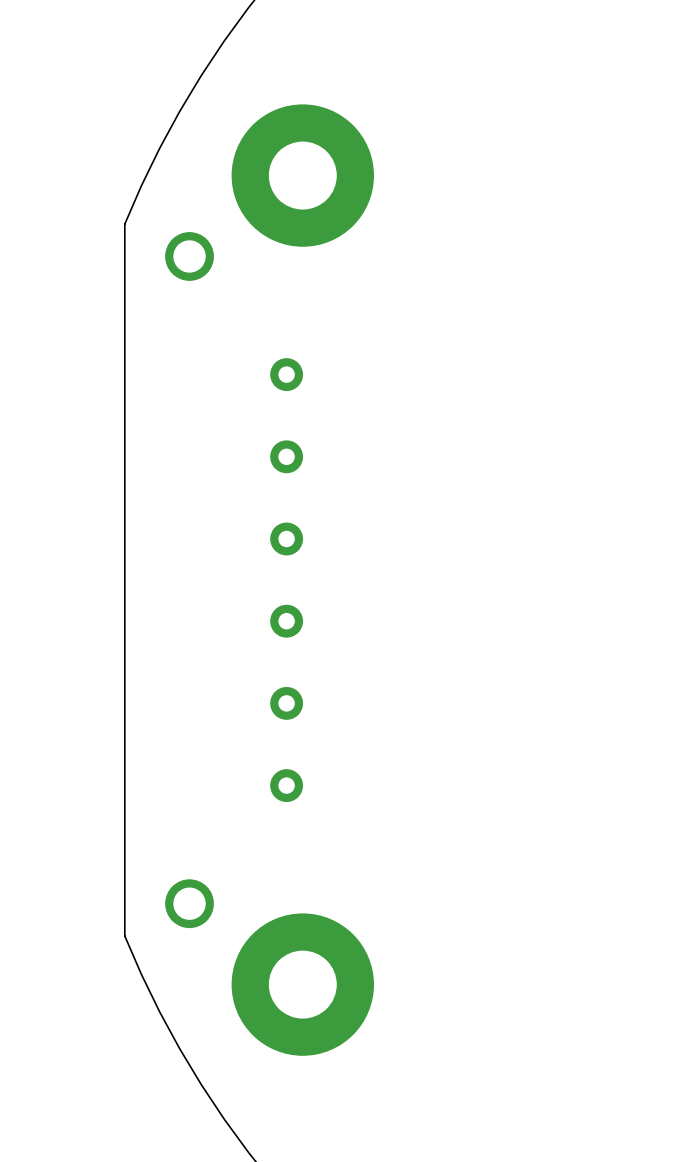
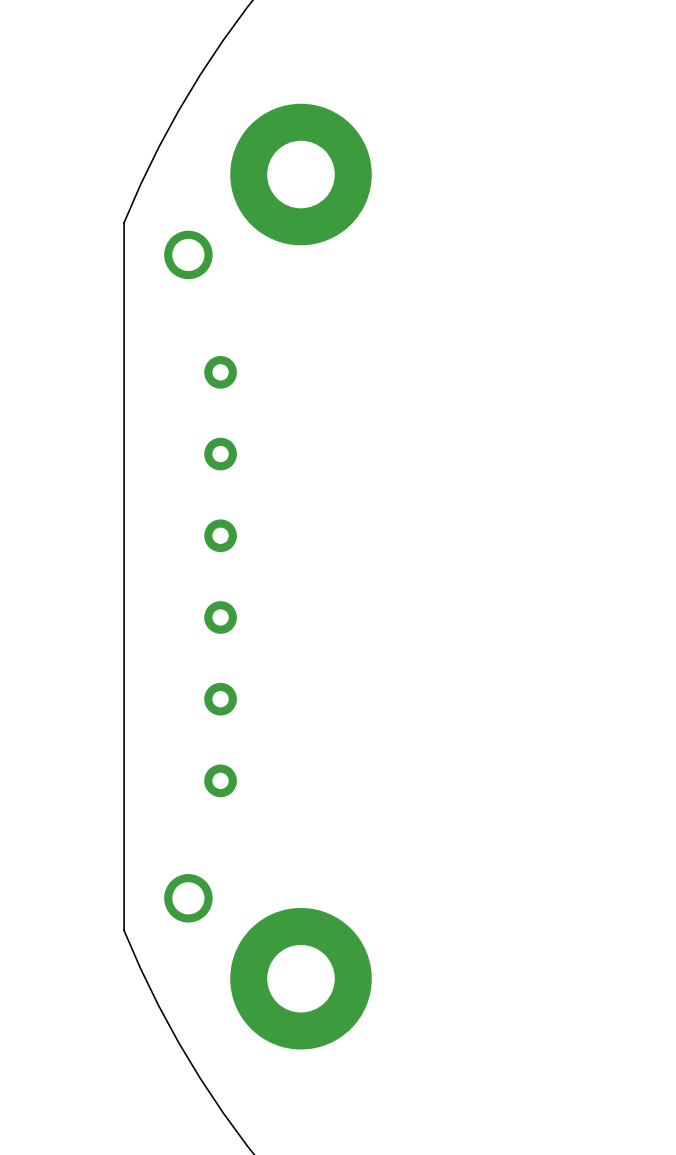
part position: (286, 580) -> (220, 576)

